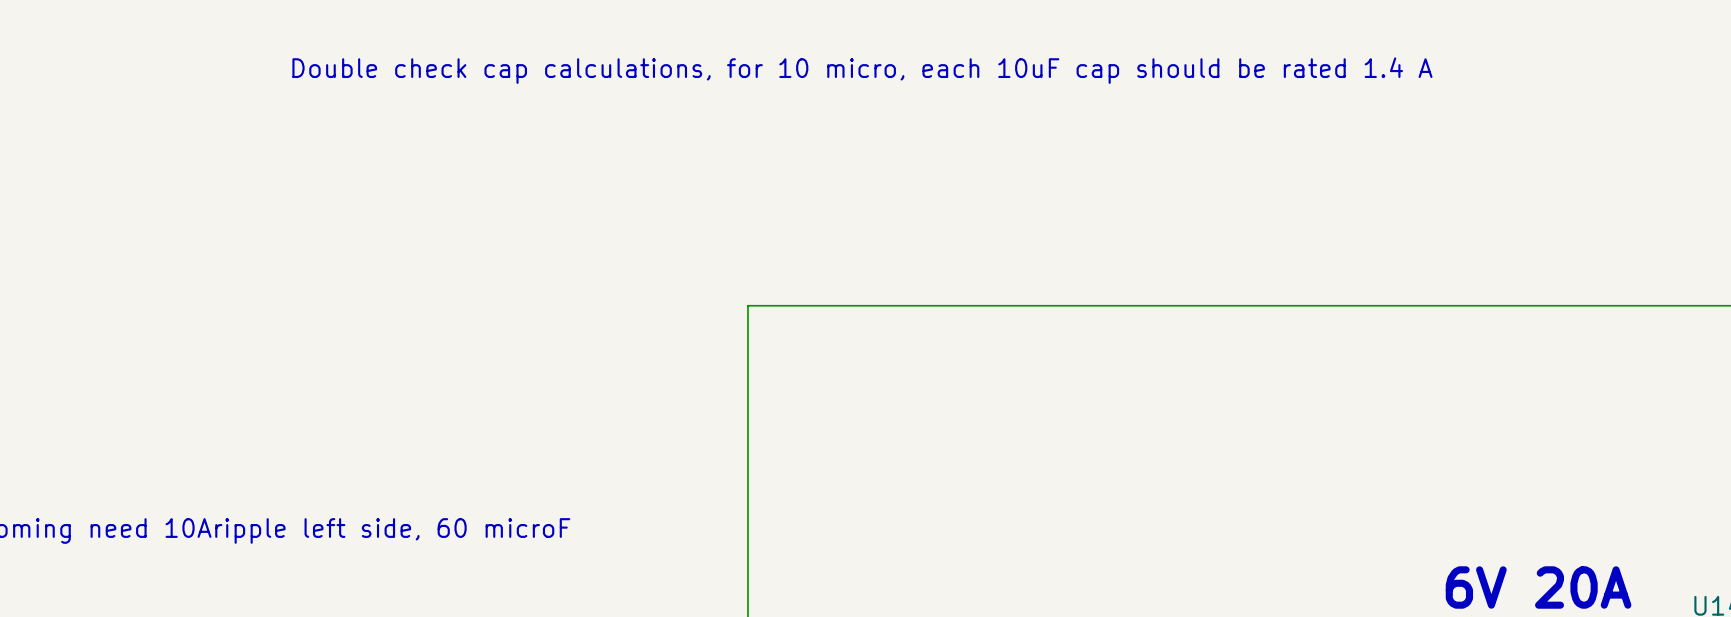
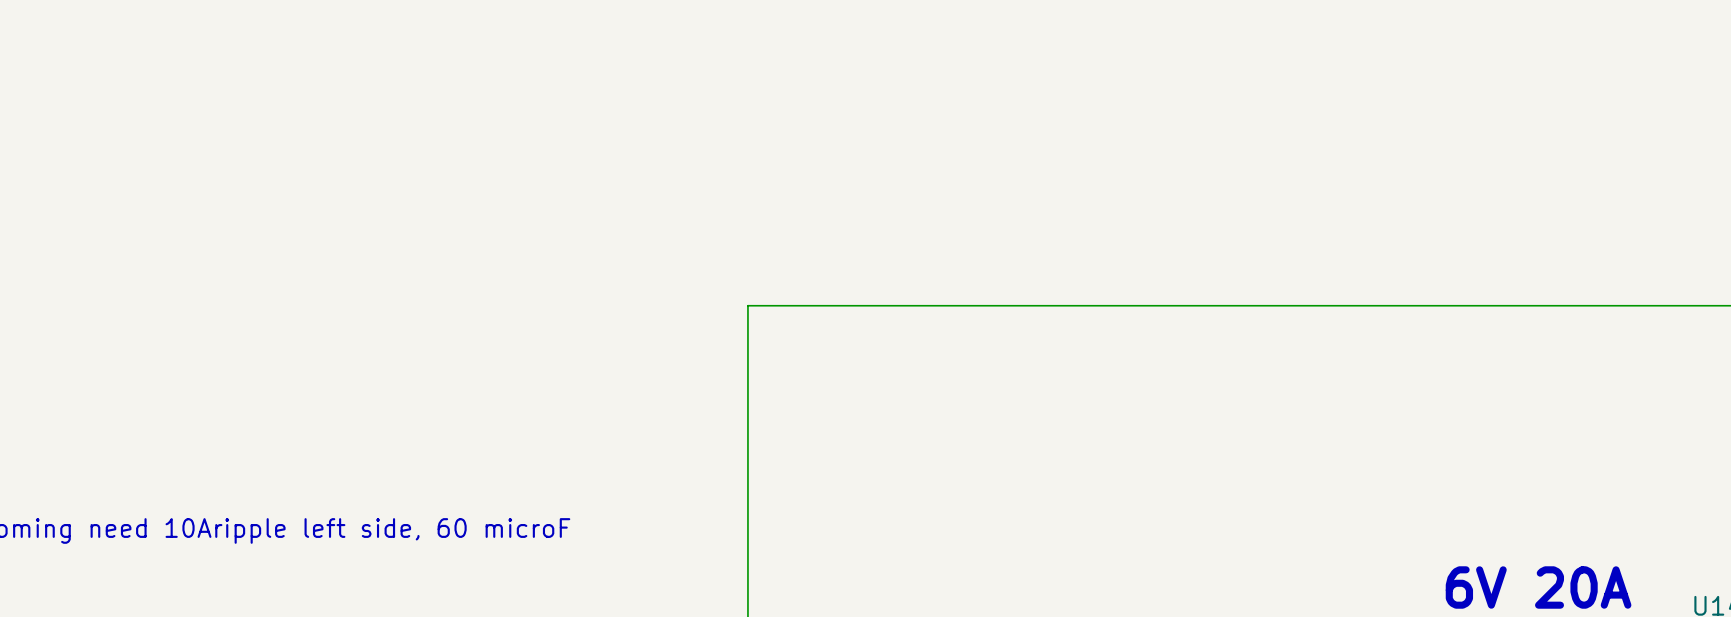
text: Double check cap calculations, for 10 micro, each 10uF cap should be rated 1.4 A (862, 70) -> none

